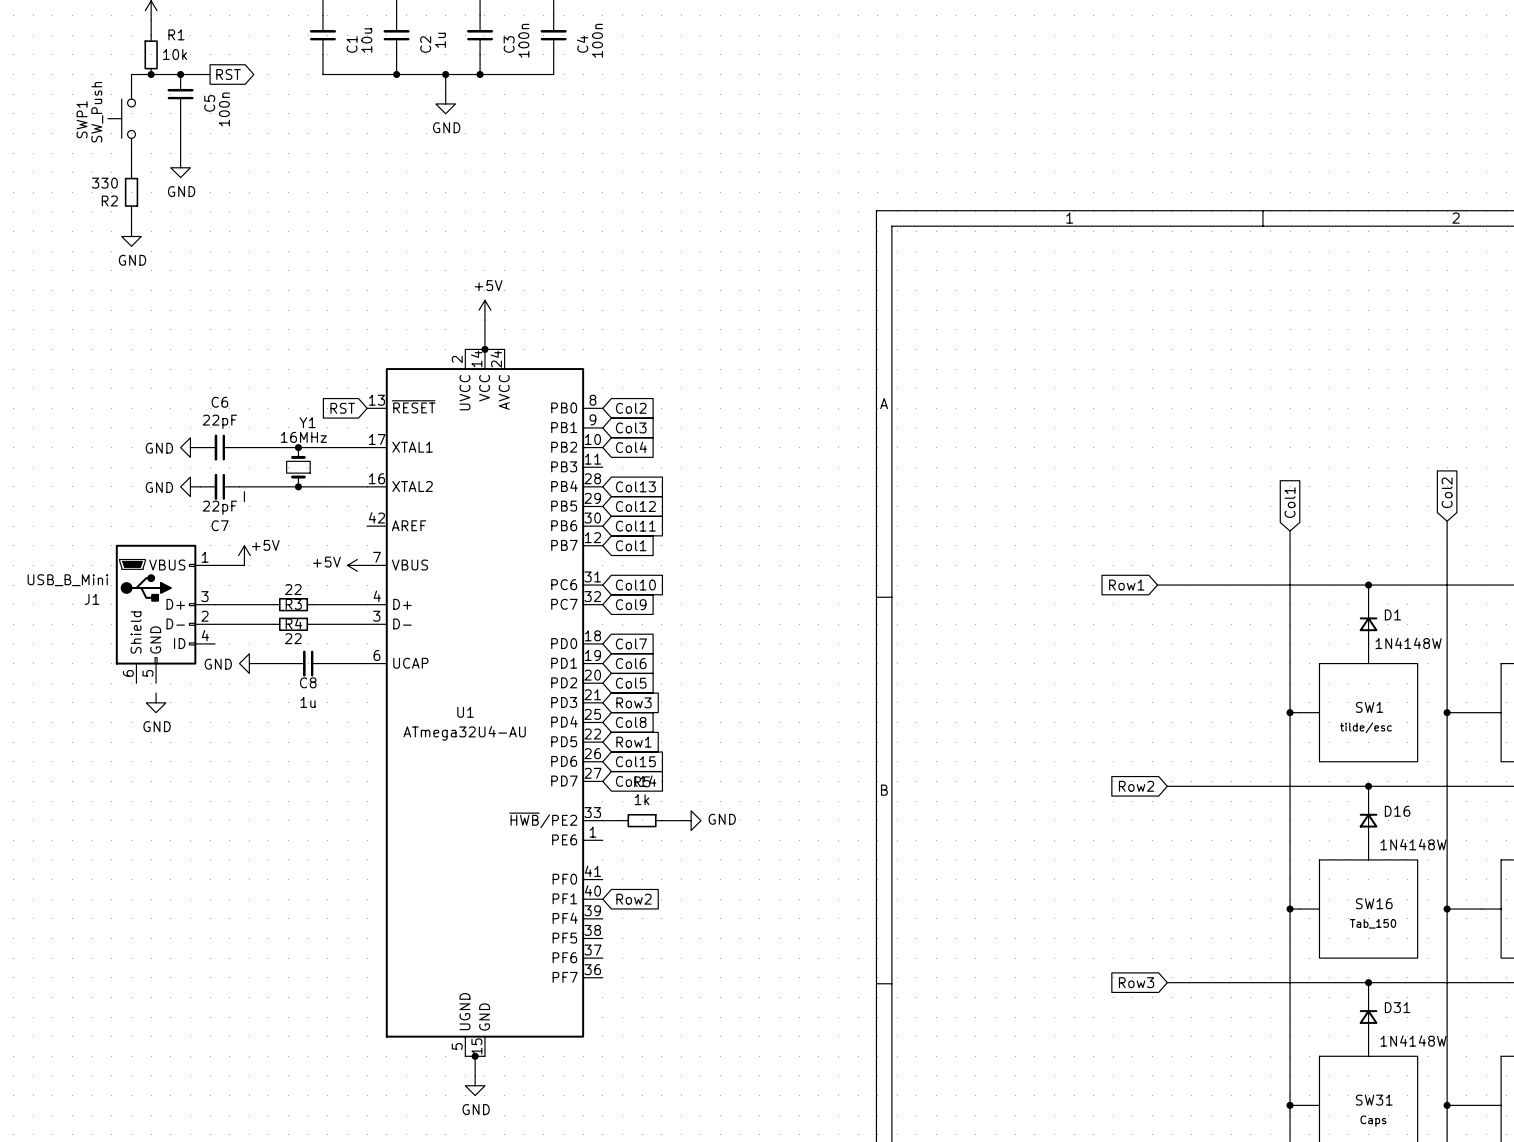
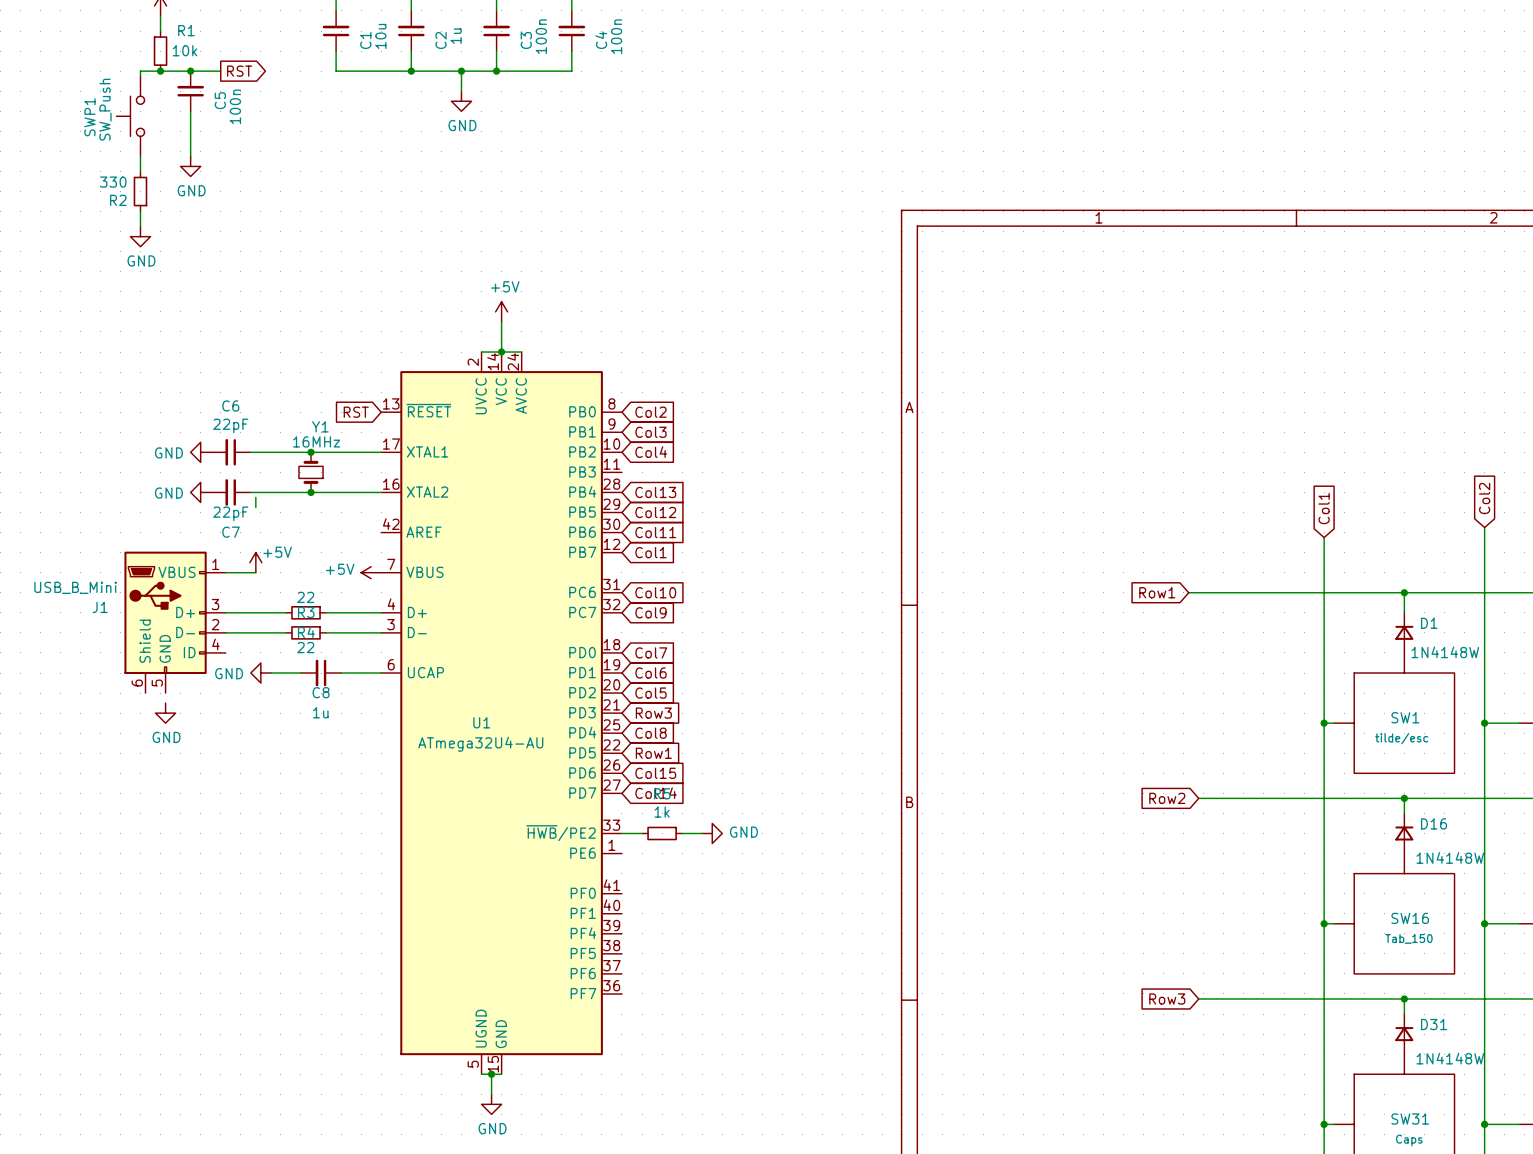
global label: Row2 (634, 899) -> none

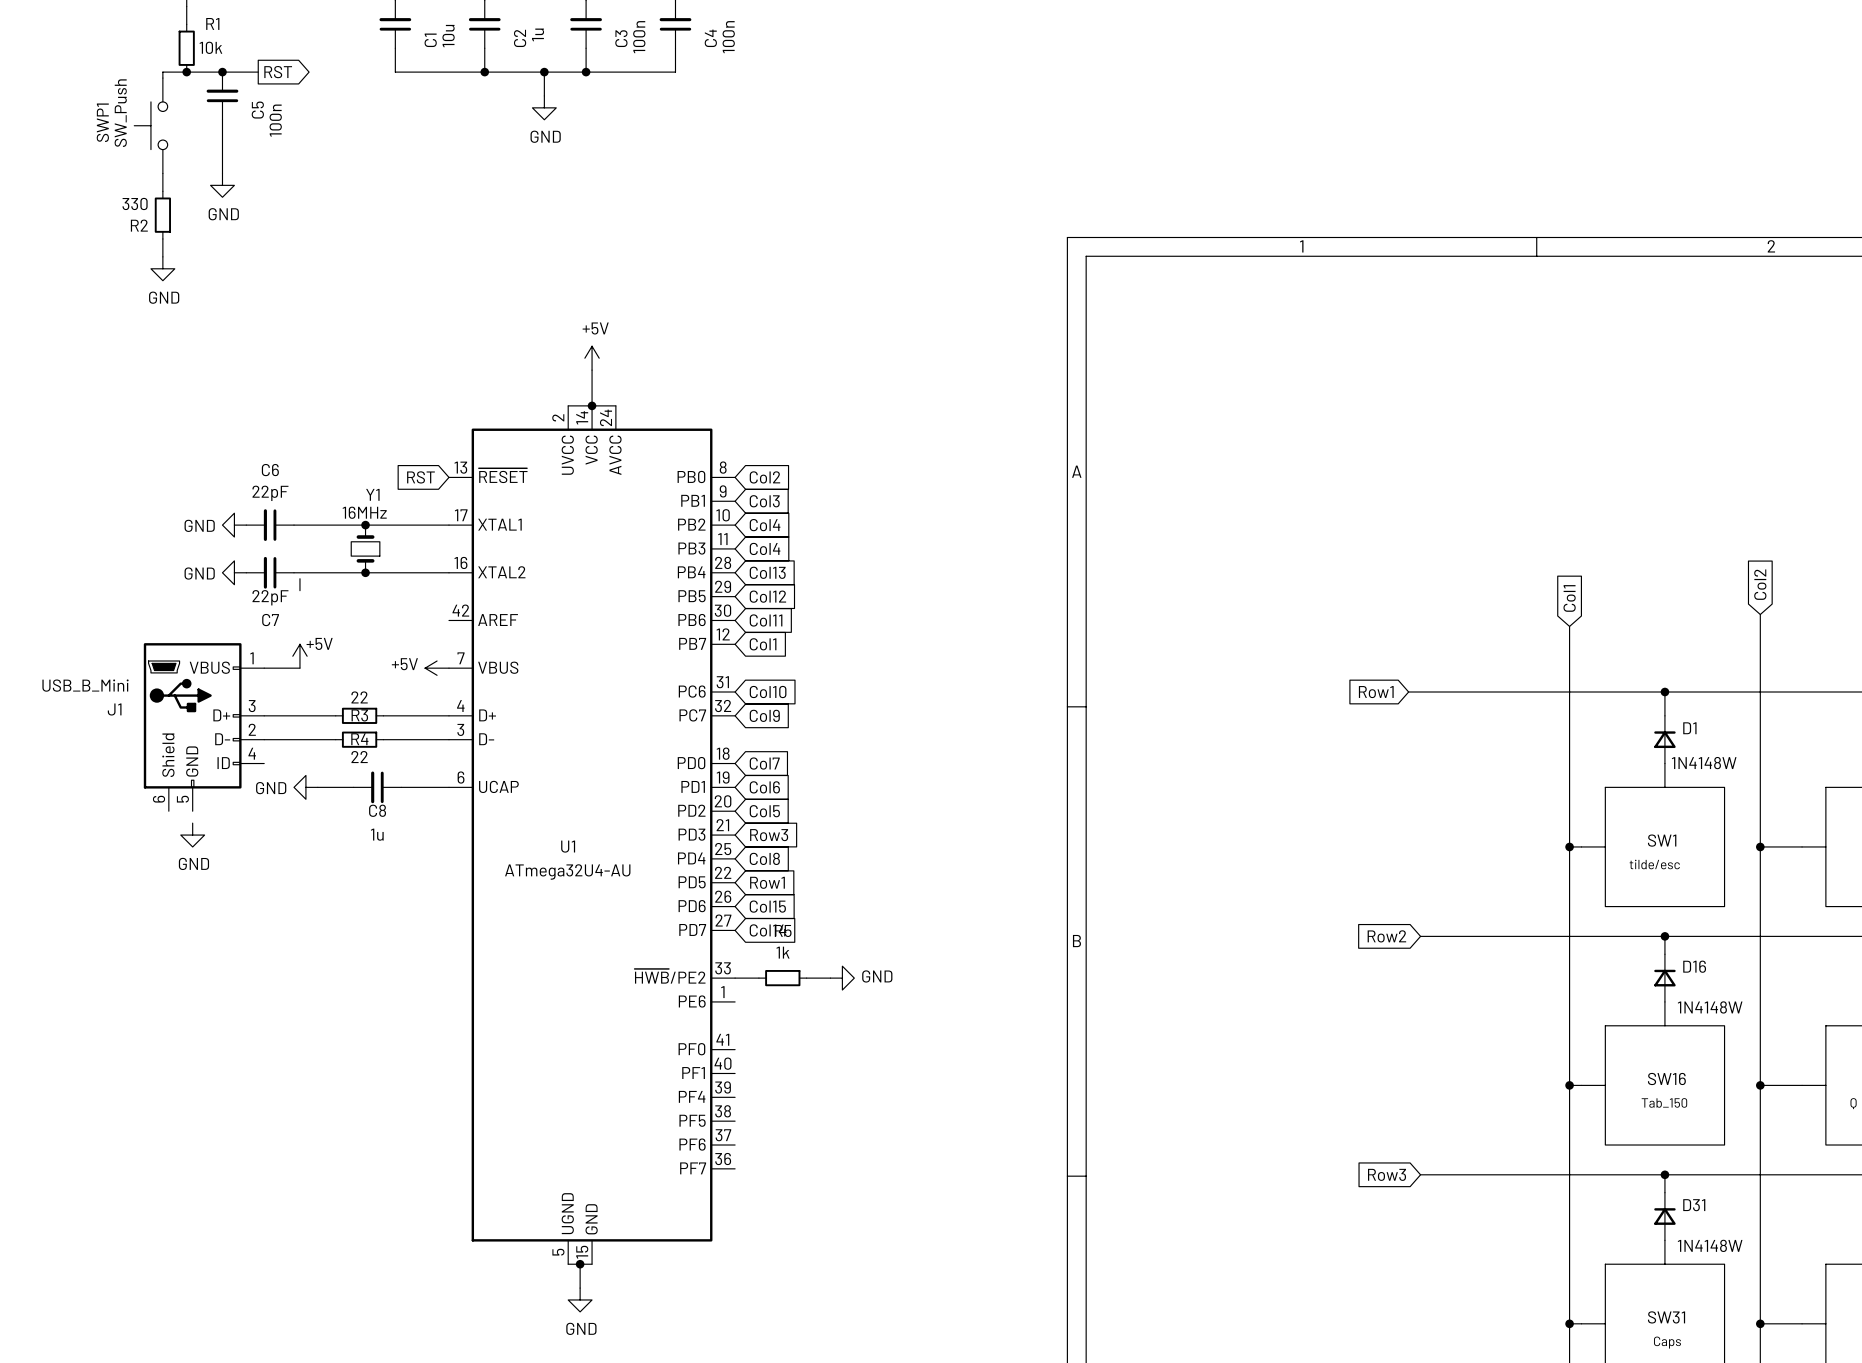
global label: none -> Col4 (765, 548)

